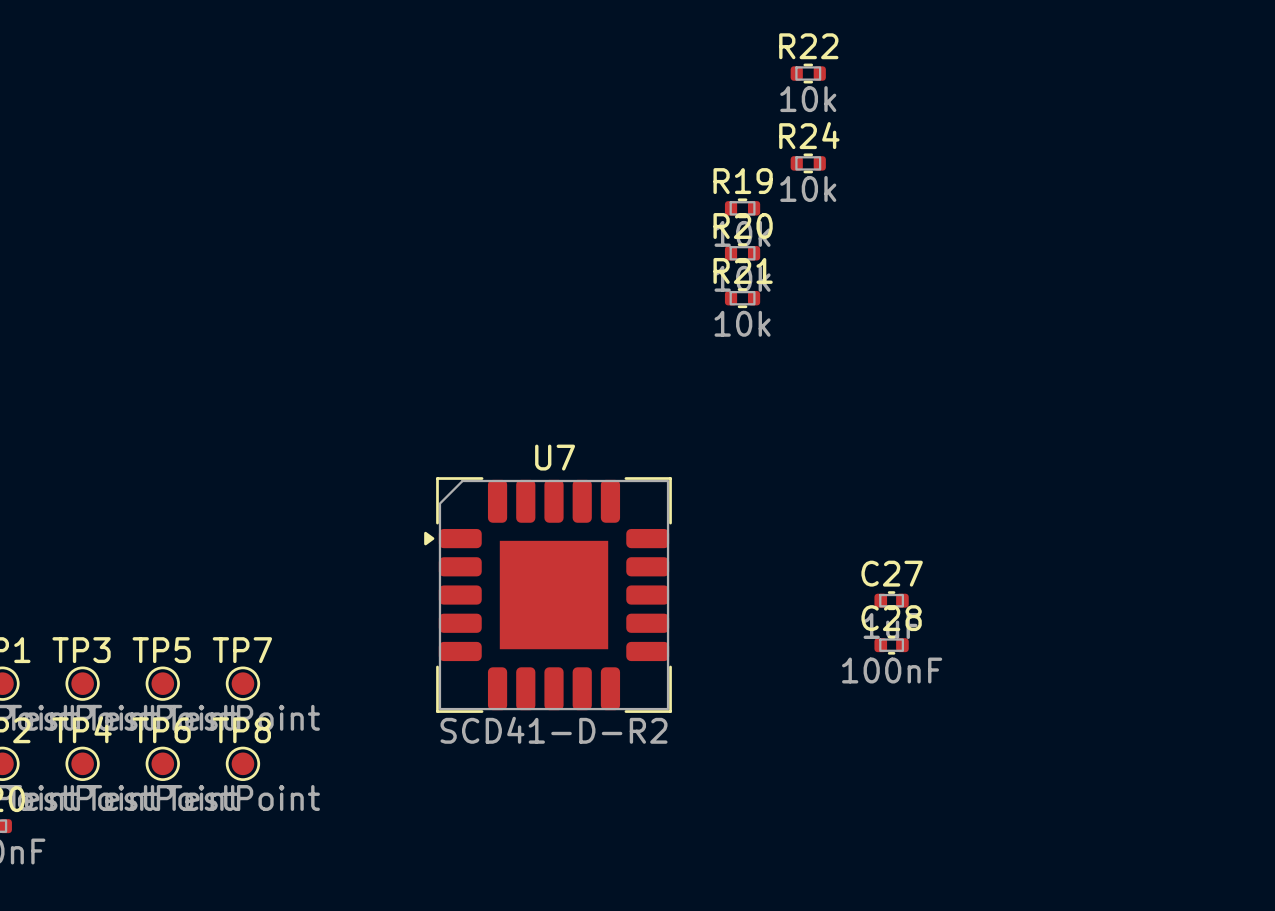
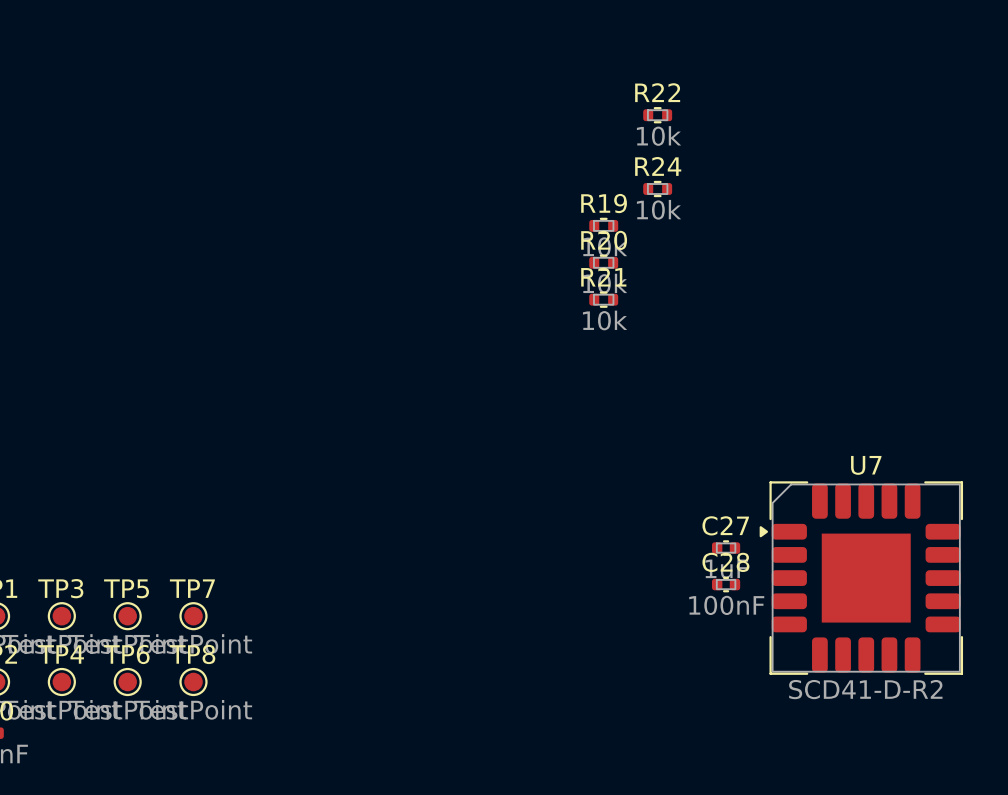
U7 position: (548, 595) -> (861, 578)

